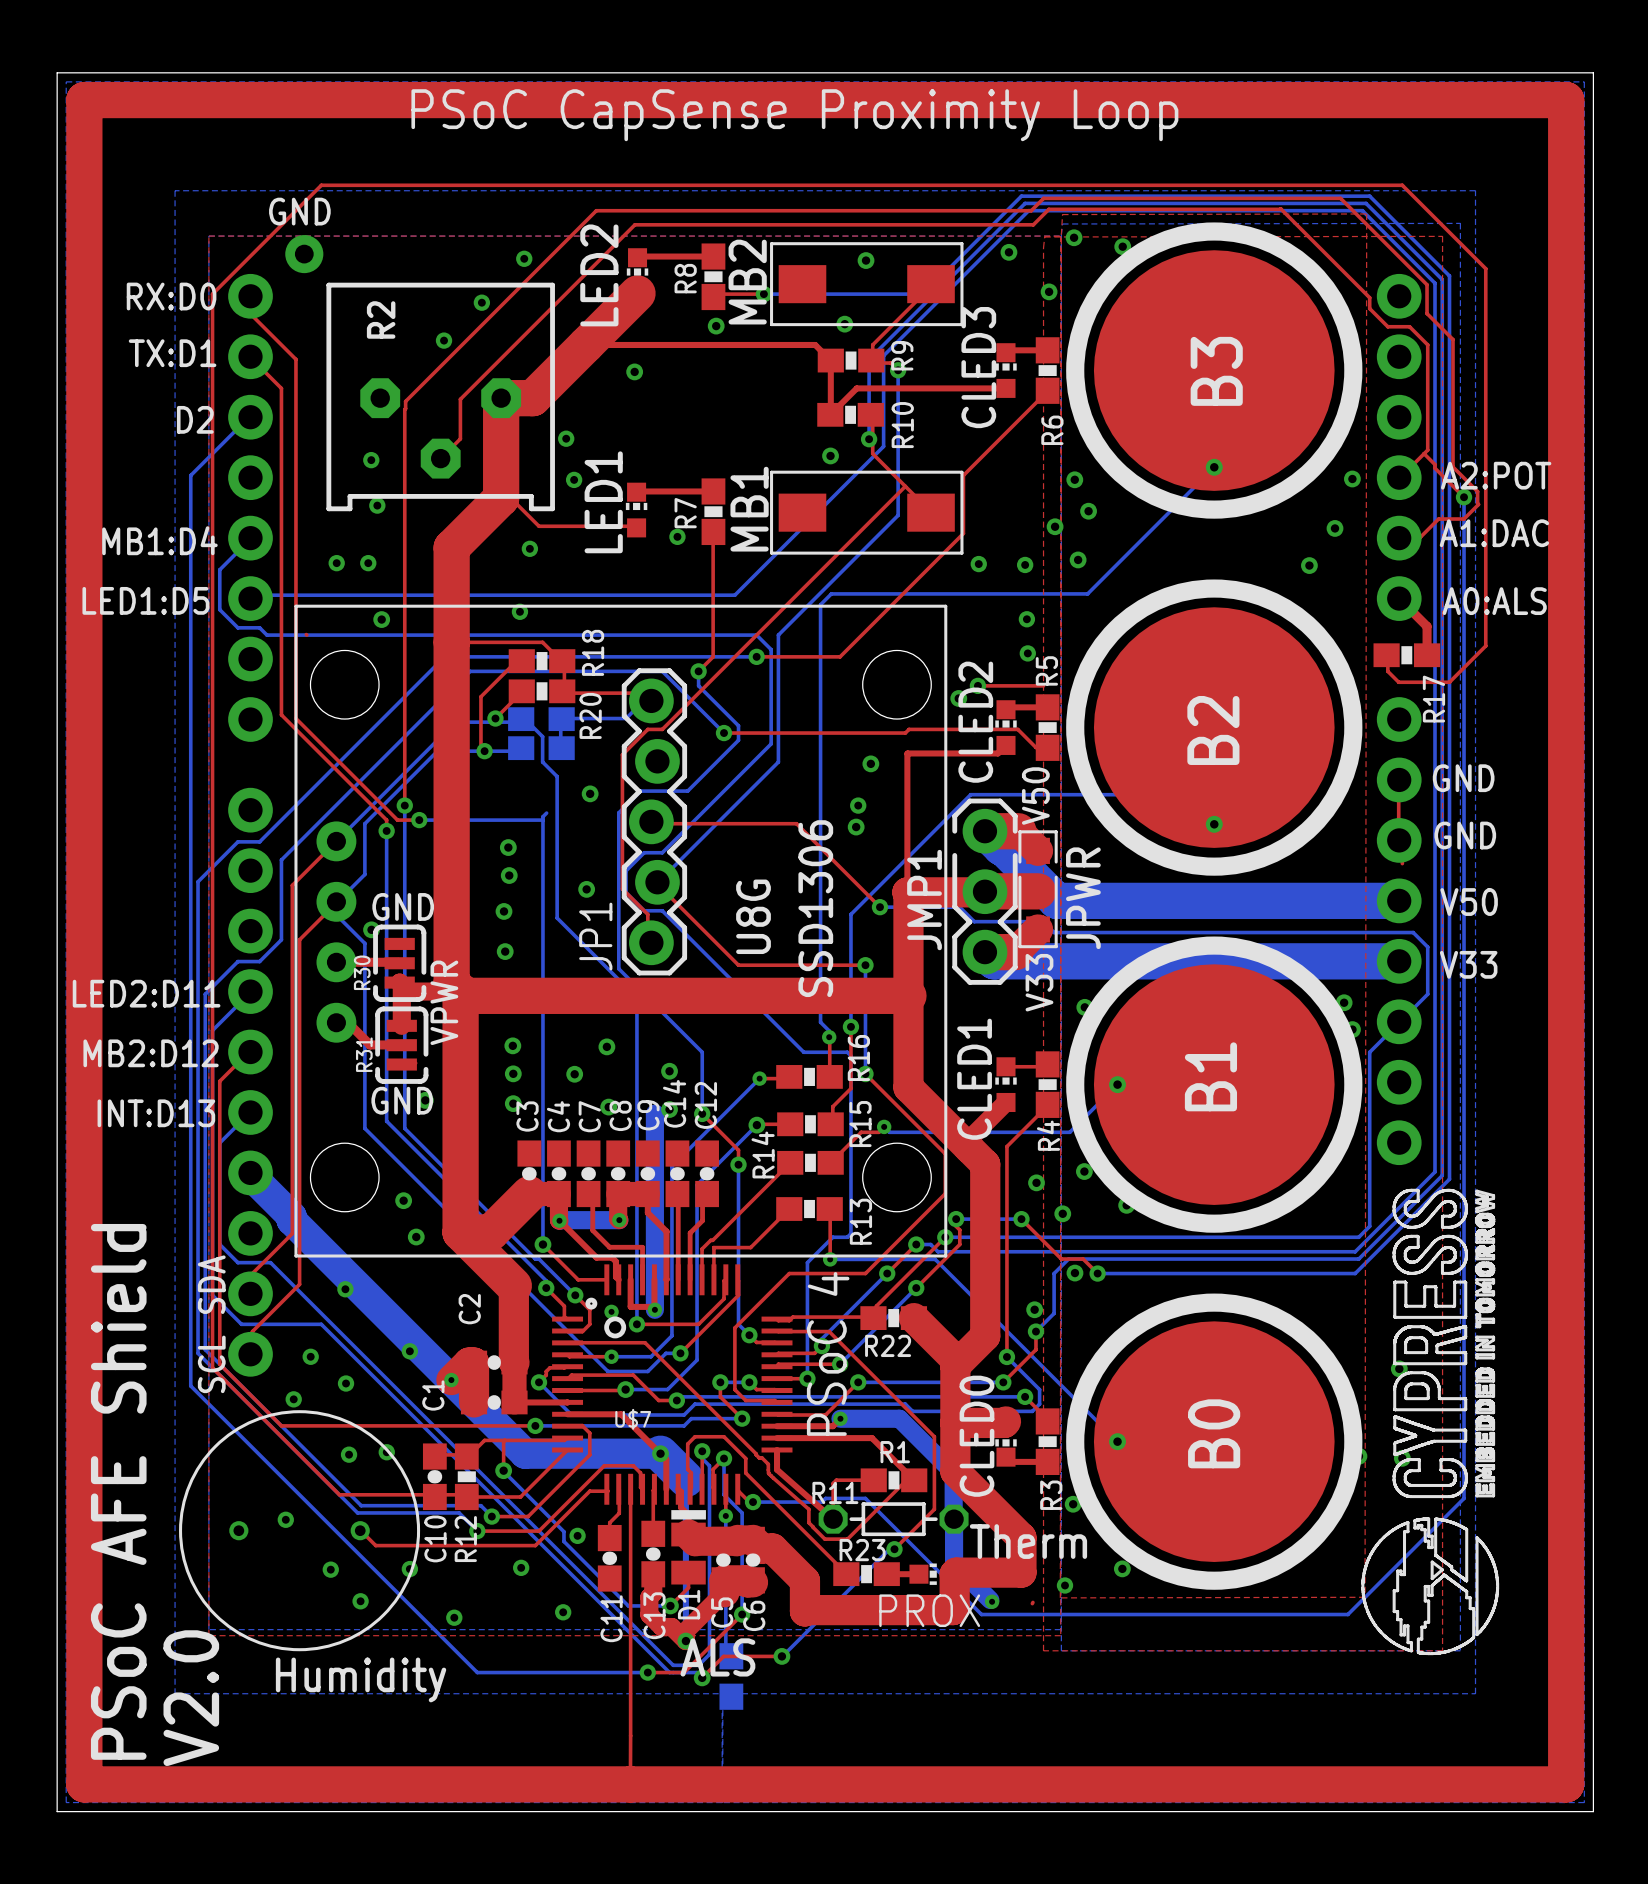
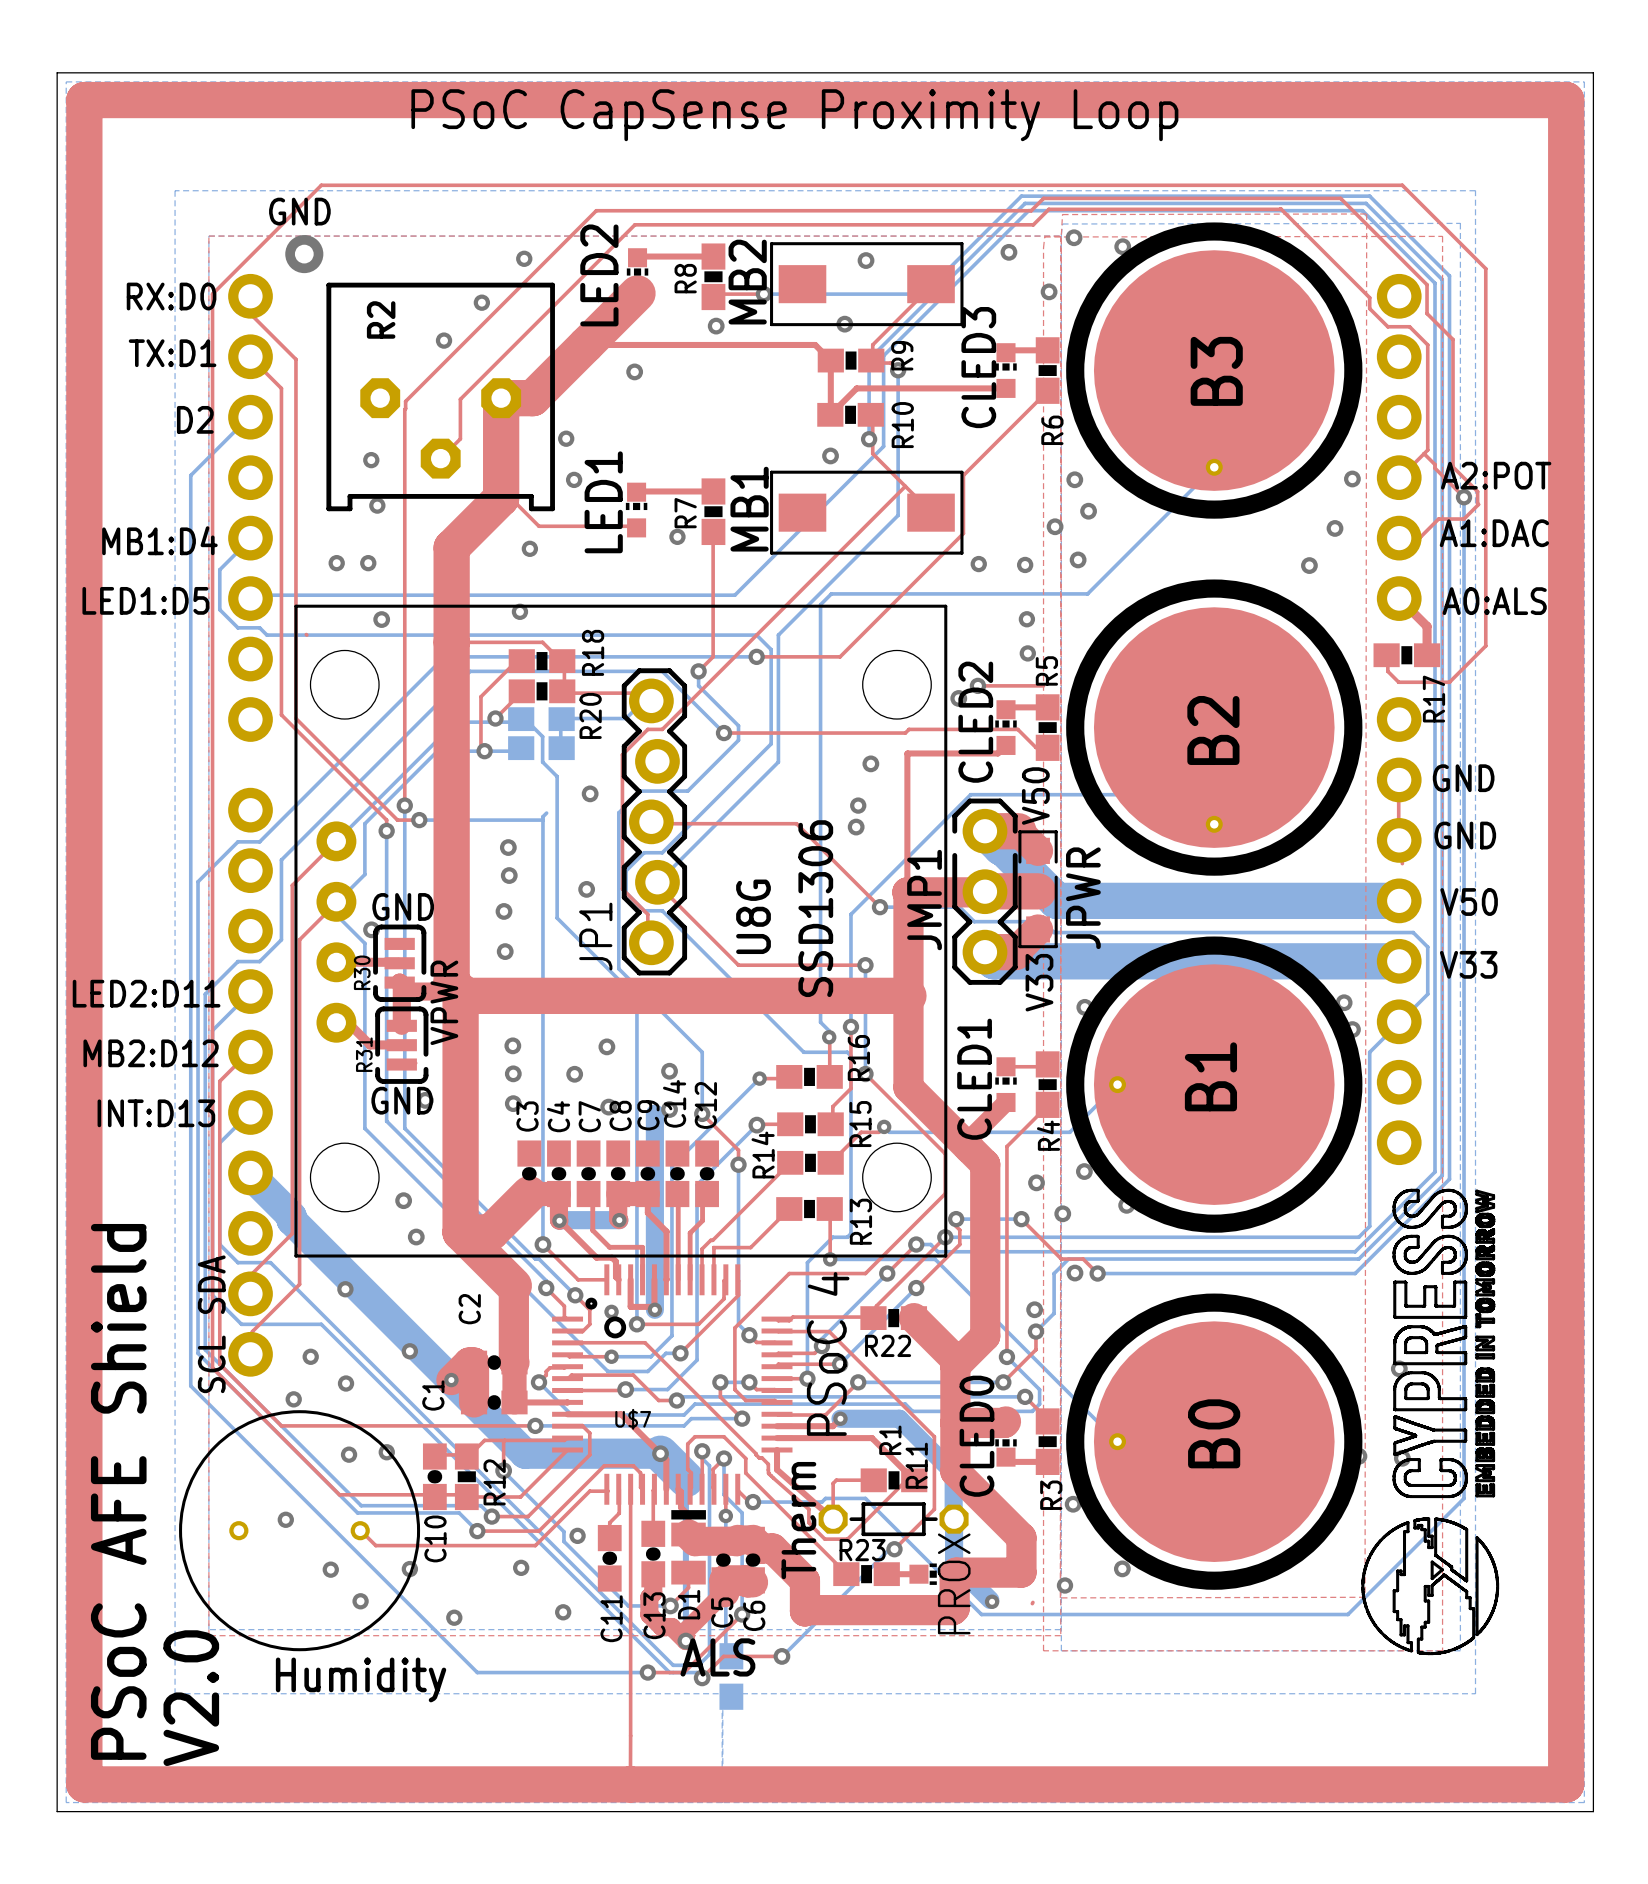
R1 name rotation: 0° (895, 1452) -> 90° counterclockwise (890, 1440)
R11 name rotation: 0° (835, 1492) -> 90° counterclockwise (916, 1465)
R11 name position: R11 (835, 1492) -> R11 (916, 1465)
R12 name position: R12 (465, 1539) -> R12 (494, 1482)
text rotation: 0° (1028, 1541) -> 90° counterclockwise (798, 1520)
text position: Therm (1028, 1541) -> Therm (798, 1520)
PROX name rotation: 0° (929, 1610) -> 90° counterclockwise (954, 1583)

